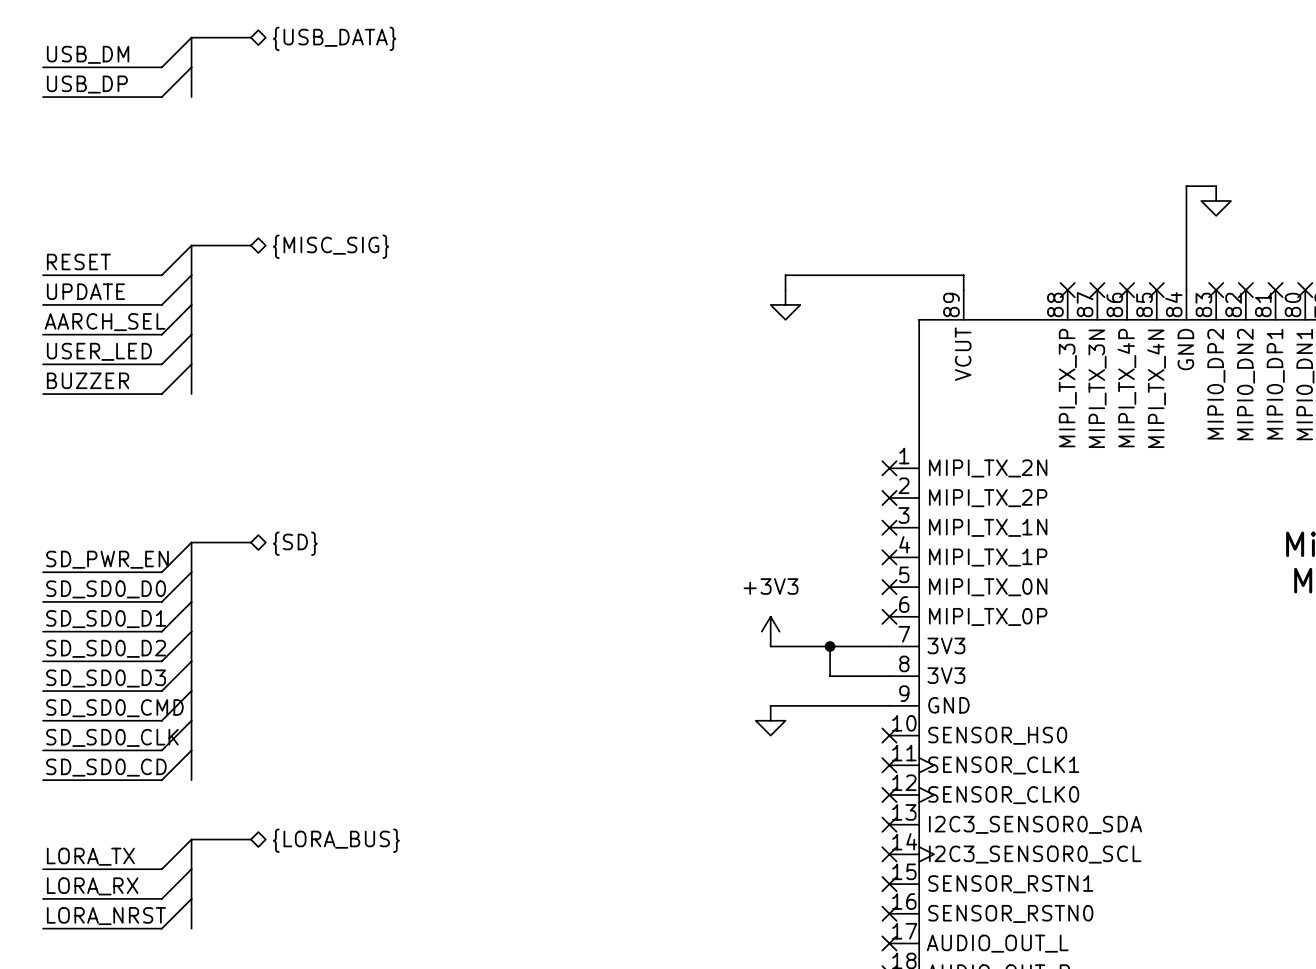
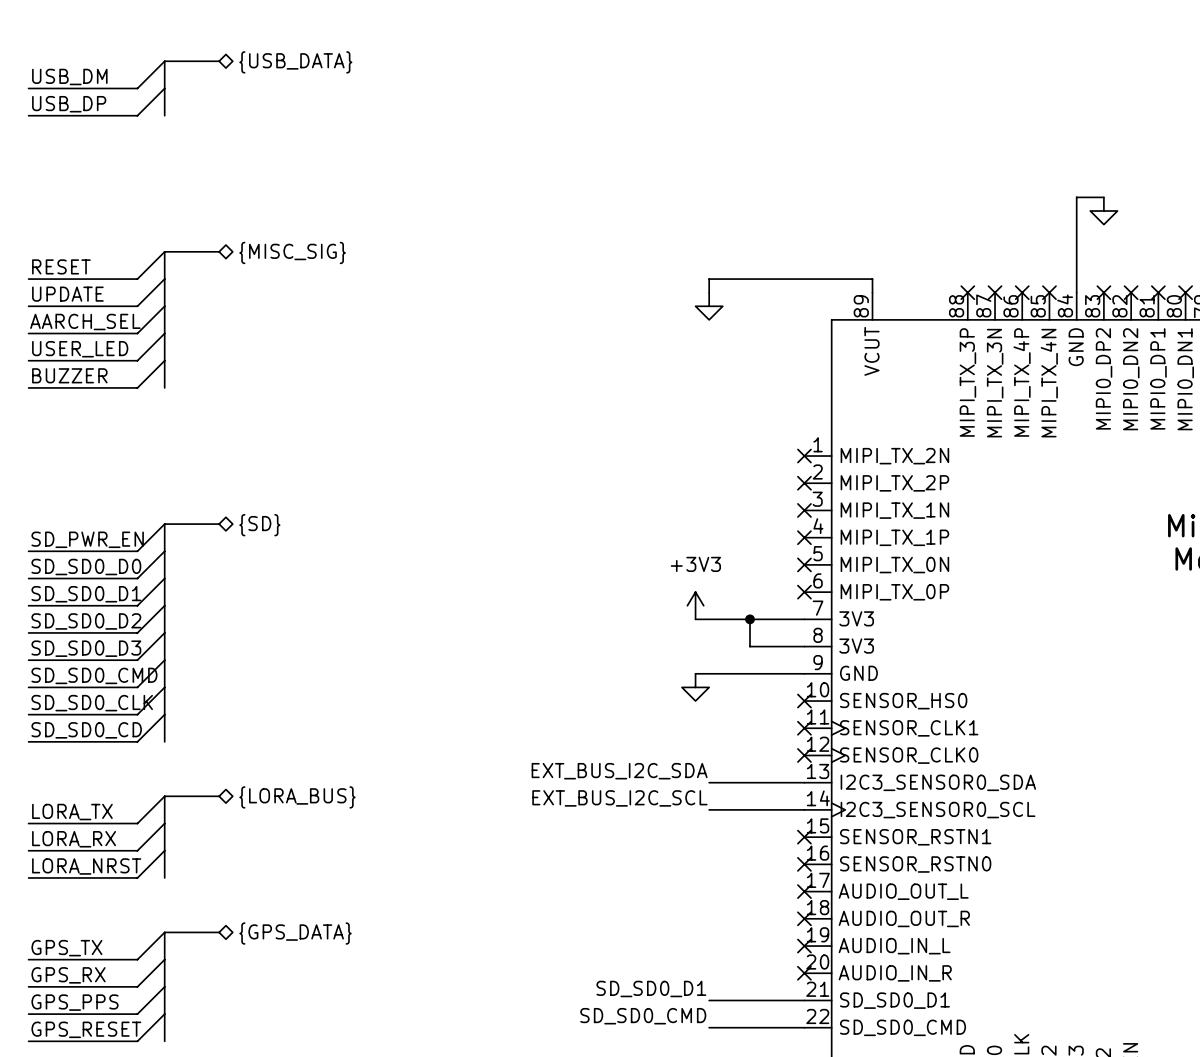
label: none -> EXT_BUS_I2C_SDA (619, 771)
wire: none -> (709, 782) (804, 782)
no-connect mark: (889, 824) -> none
label: none -> EXT_BUS_I2C_SCL (619, 798)
wire: none -> (709, 809) (804, 809)
no-connect mark: (889, 854) -> none

